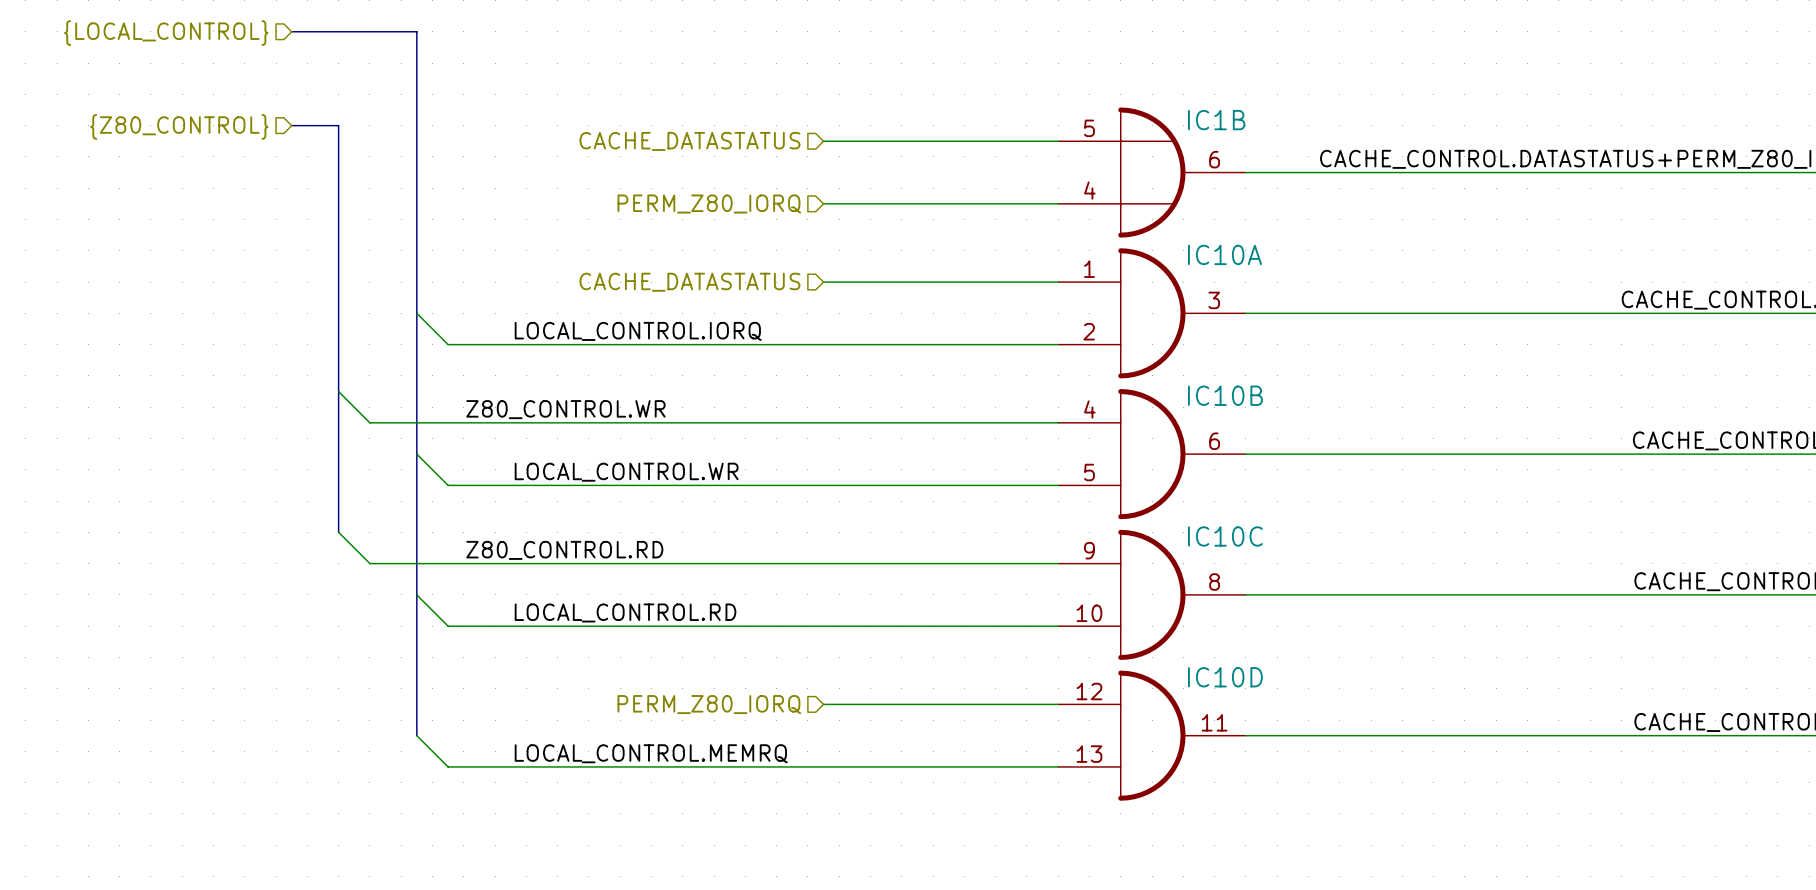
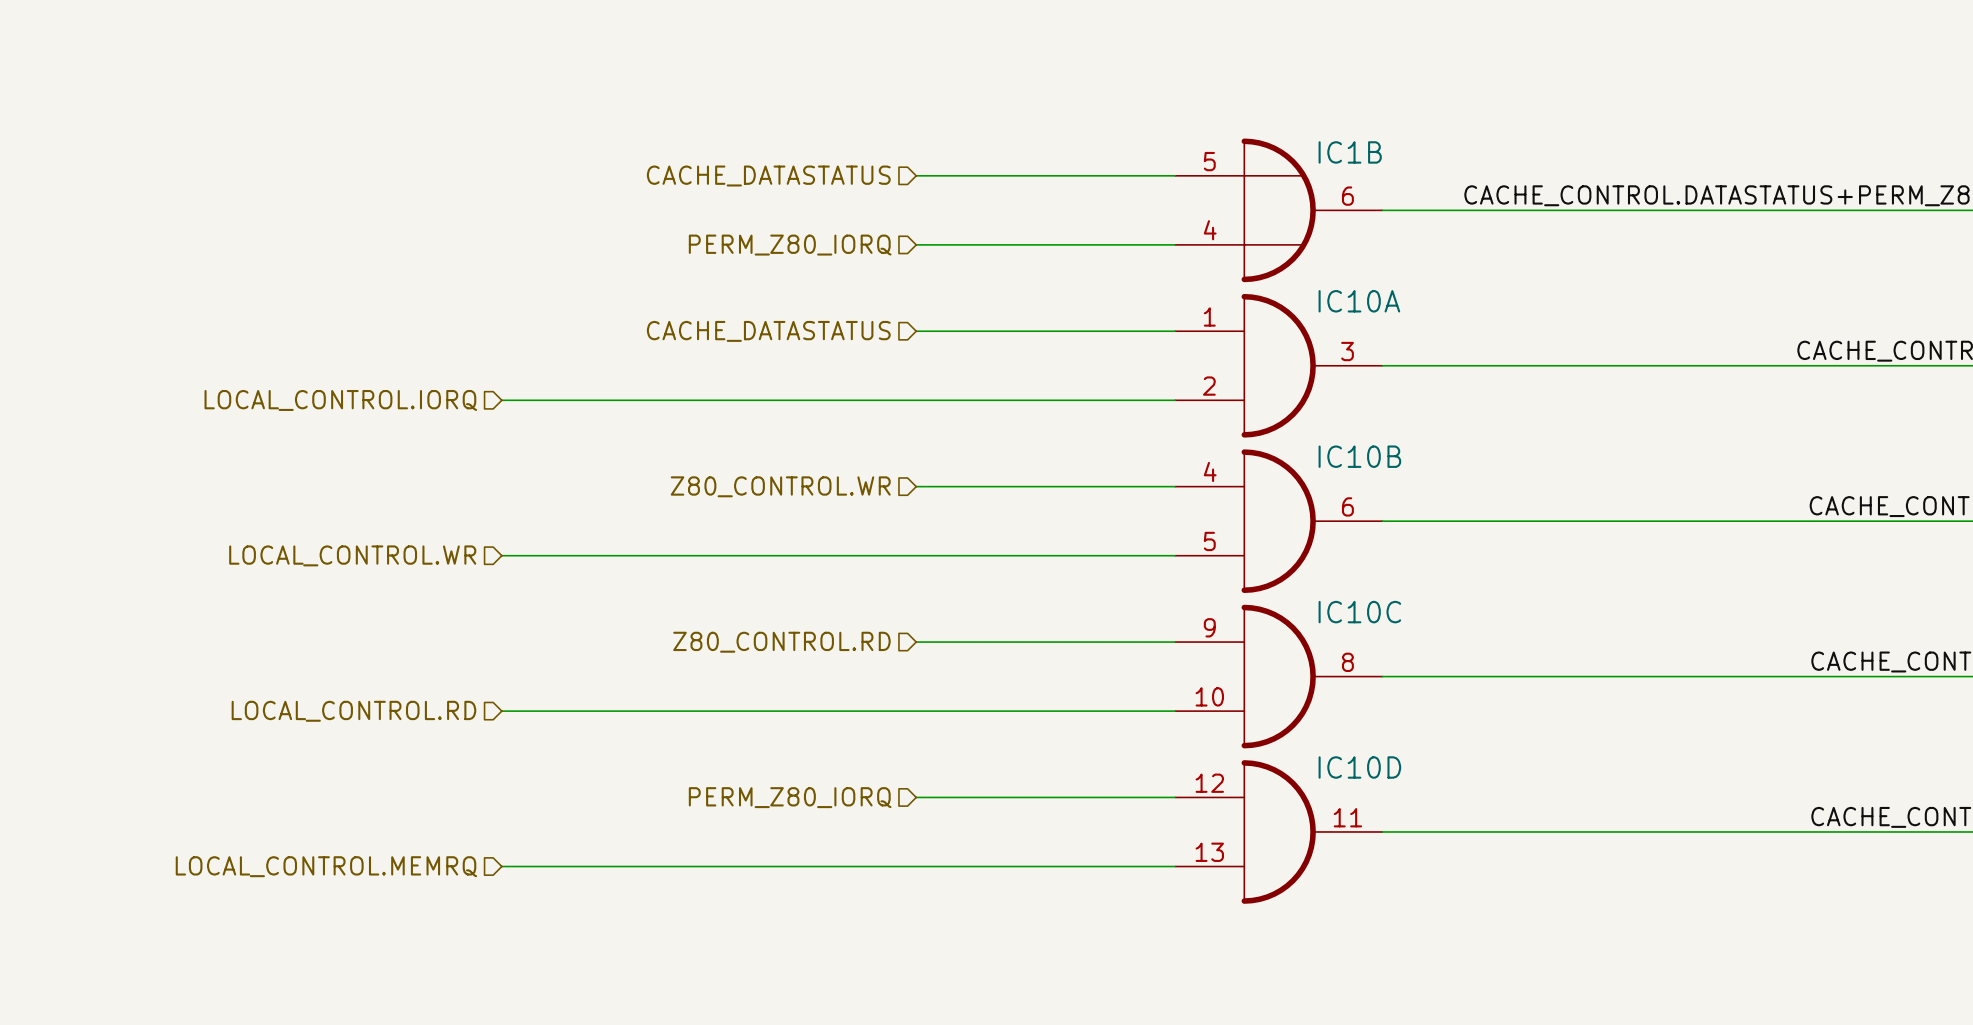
bus: (291, 31) (416, 31) (416, 735) -> none
hierarchical label: {LOCAL_CONTROL} (166, 33) -> none
bus: (291, 125) (338, 125) (338, 532) -> none
hierarchical label: {Z80_CONTROL} (179, 126) -> none
wire: (416, 313) (448, 344) -> none
label: LOCAL_CONTROL.IORQ (638, 331) -> none
hierarchical label: none -> LOCAL_CONTROL.IORQ (340, 400)
wire: (338, 391) (369, 422) (823, 422) -> none
label: Z80_CONTROL.WR (565, 409) -> none
hierarchical label: none -> Z80_CONTROL.WR (780, 486)
wire: (416, 454) (448, 485) -> none
label: LOCAL_CONTROL.WR (626, 472) -> none
hierarchical label: none -> LOCAL_CONTROL.WR (352, 555)
wire: (338, 532) (369, 563) (823, 563) -> none
label: Z80_CONTROL.RD (564, 550) -> none
hierarchical label: none -> Z80_CONTROL.RD (781, 642)
wire: (416, 594) (448, 626) -> none
label: LOCAL_CONTROL.RD (625, 612) -> none
hierarchical label: none -> LOCAL_CONTROL.RD (353, 711)
wire: (416, 735) (448, 766) -> none
label: LOCAL_CONTROL.MEMRQ (651, 753) -> none
hierarchical label: none -> LOCAL_CONTROL.MEMRQ (326, 866)

